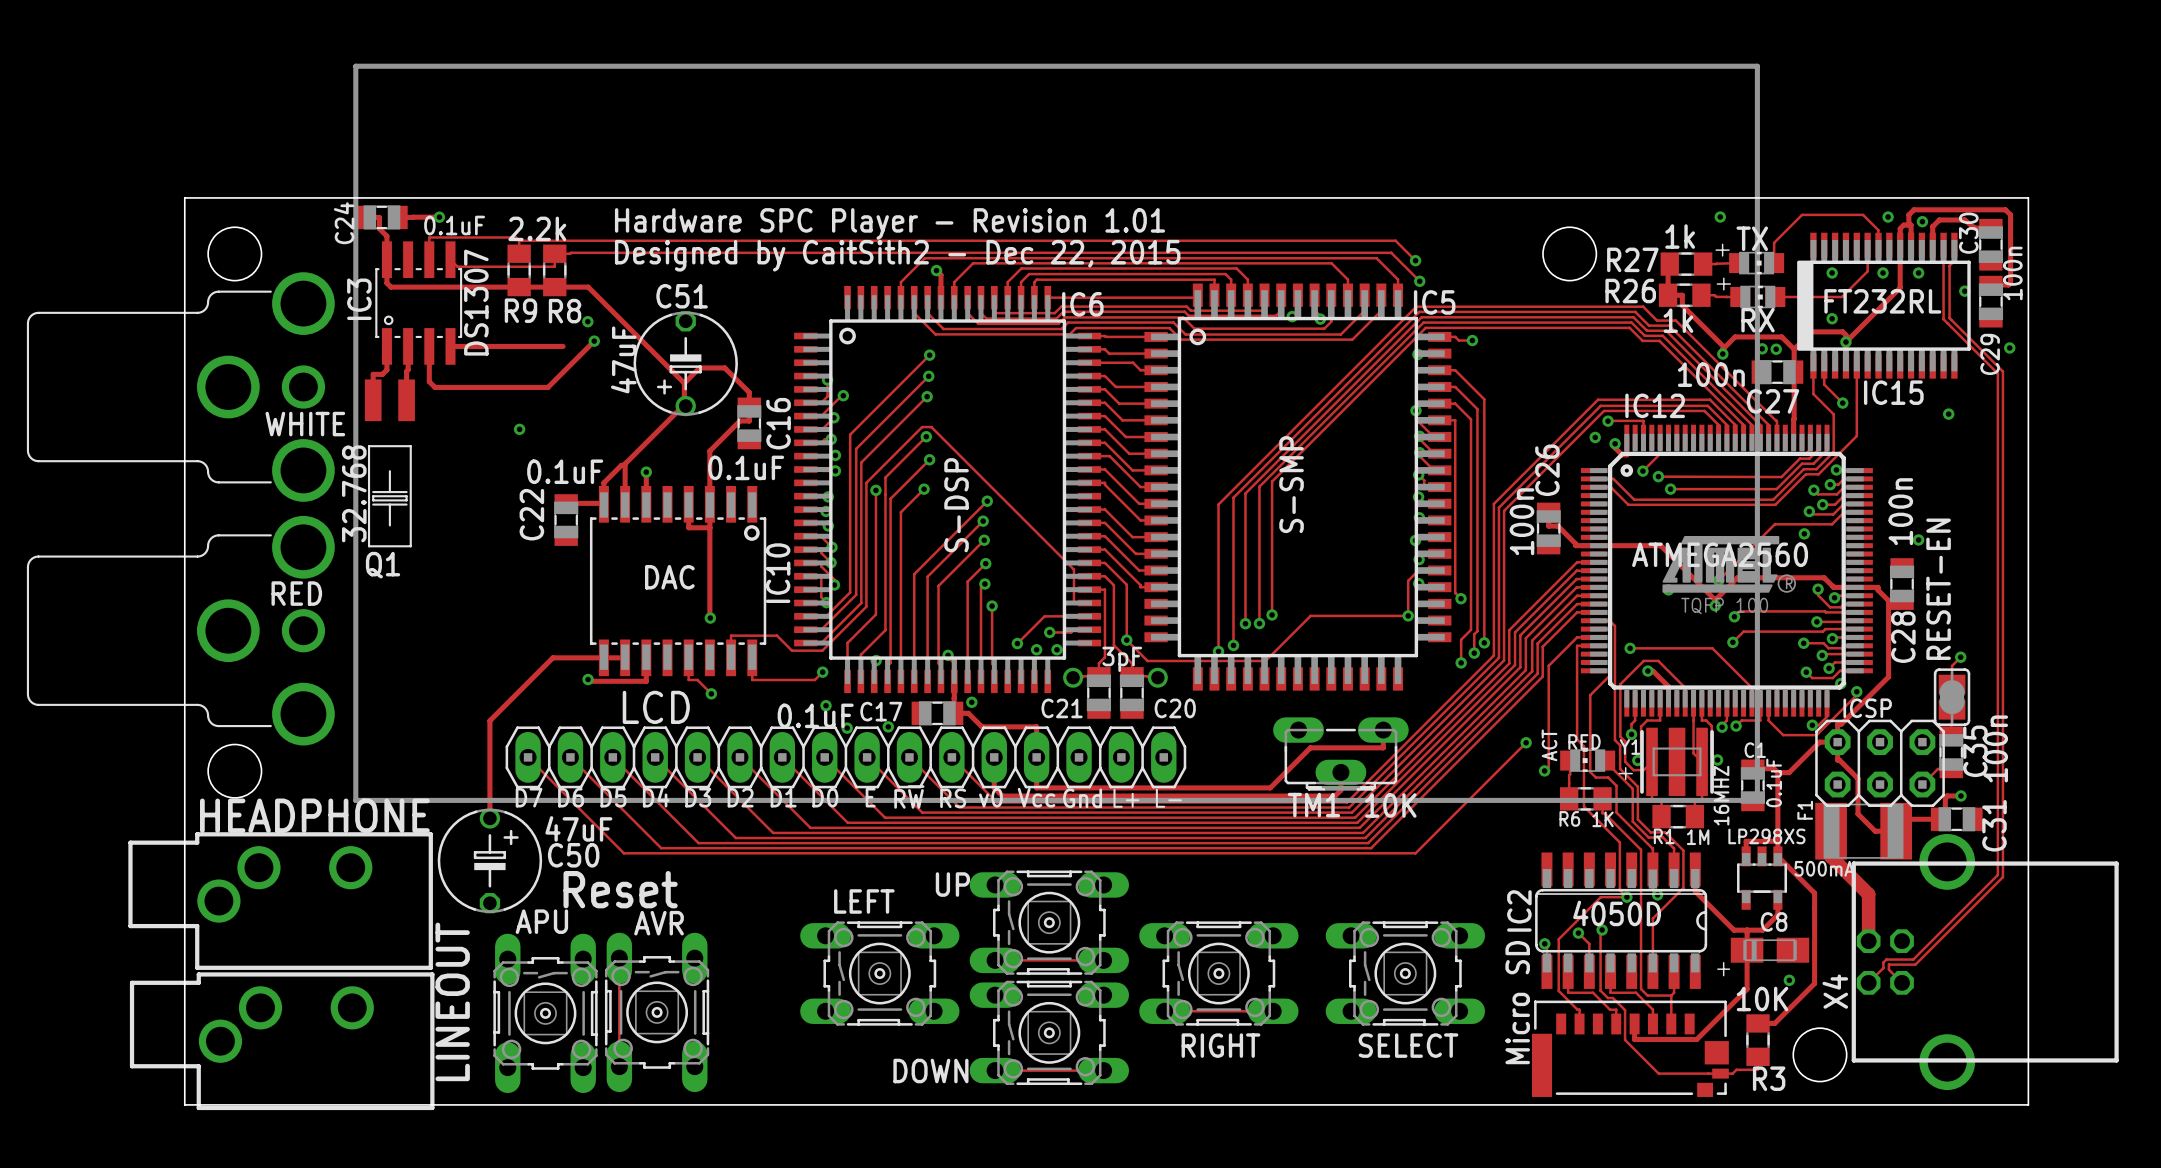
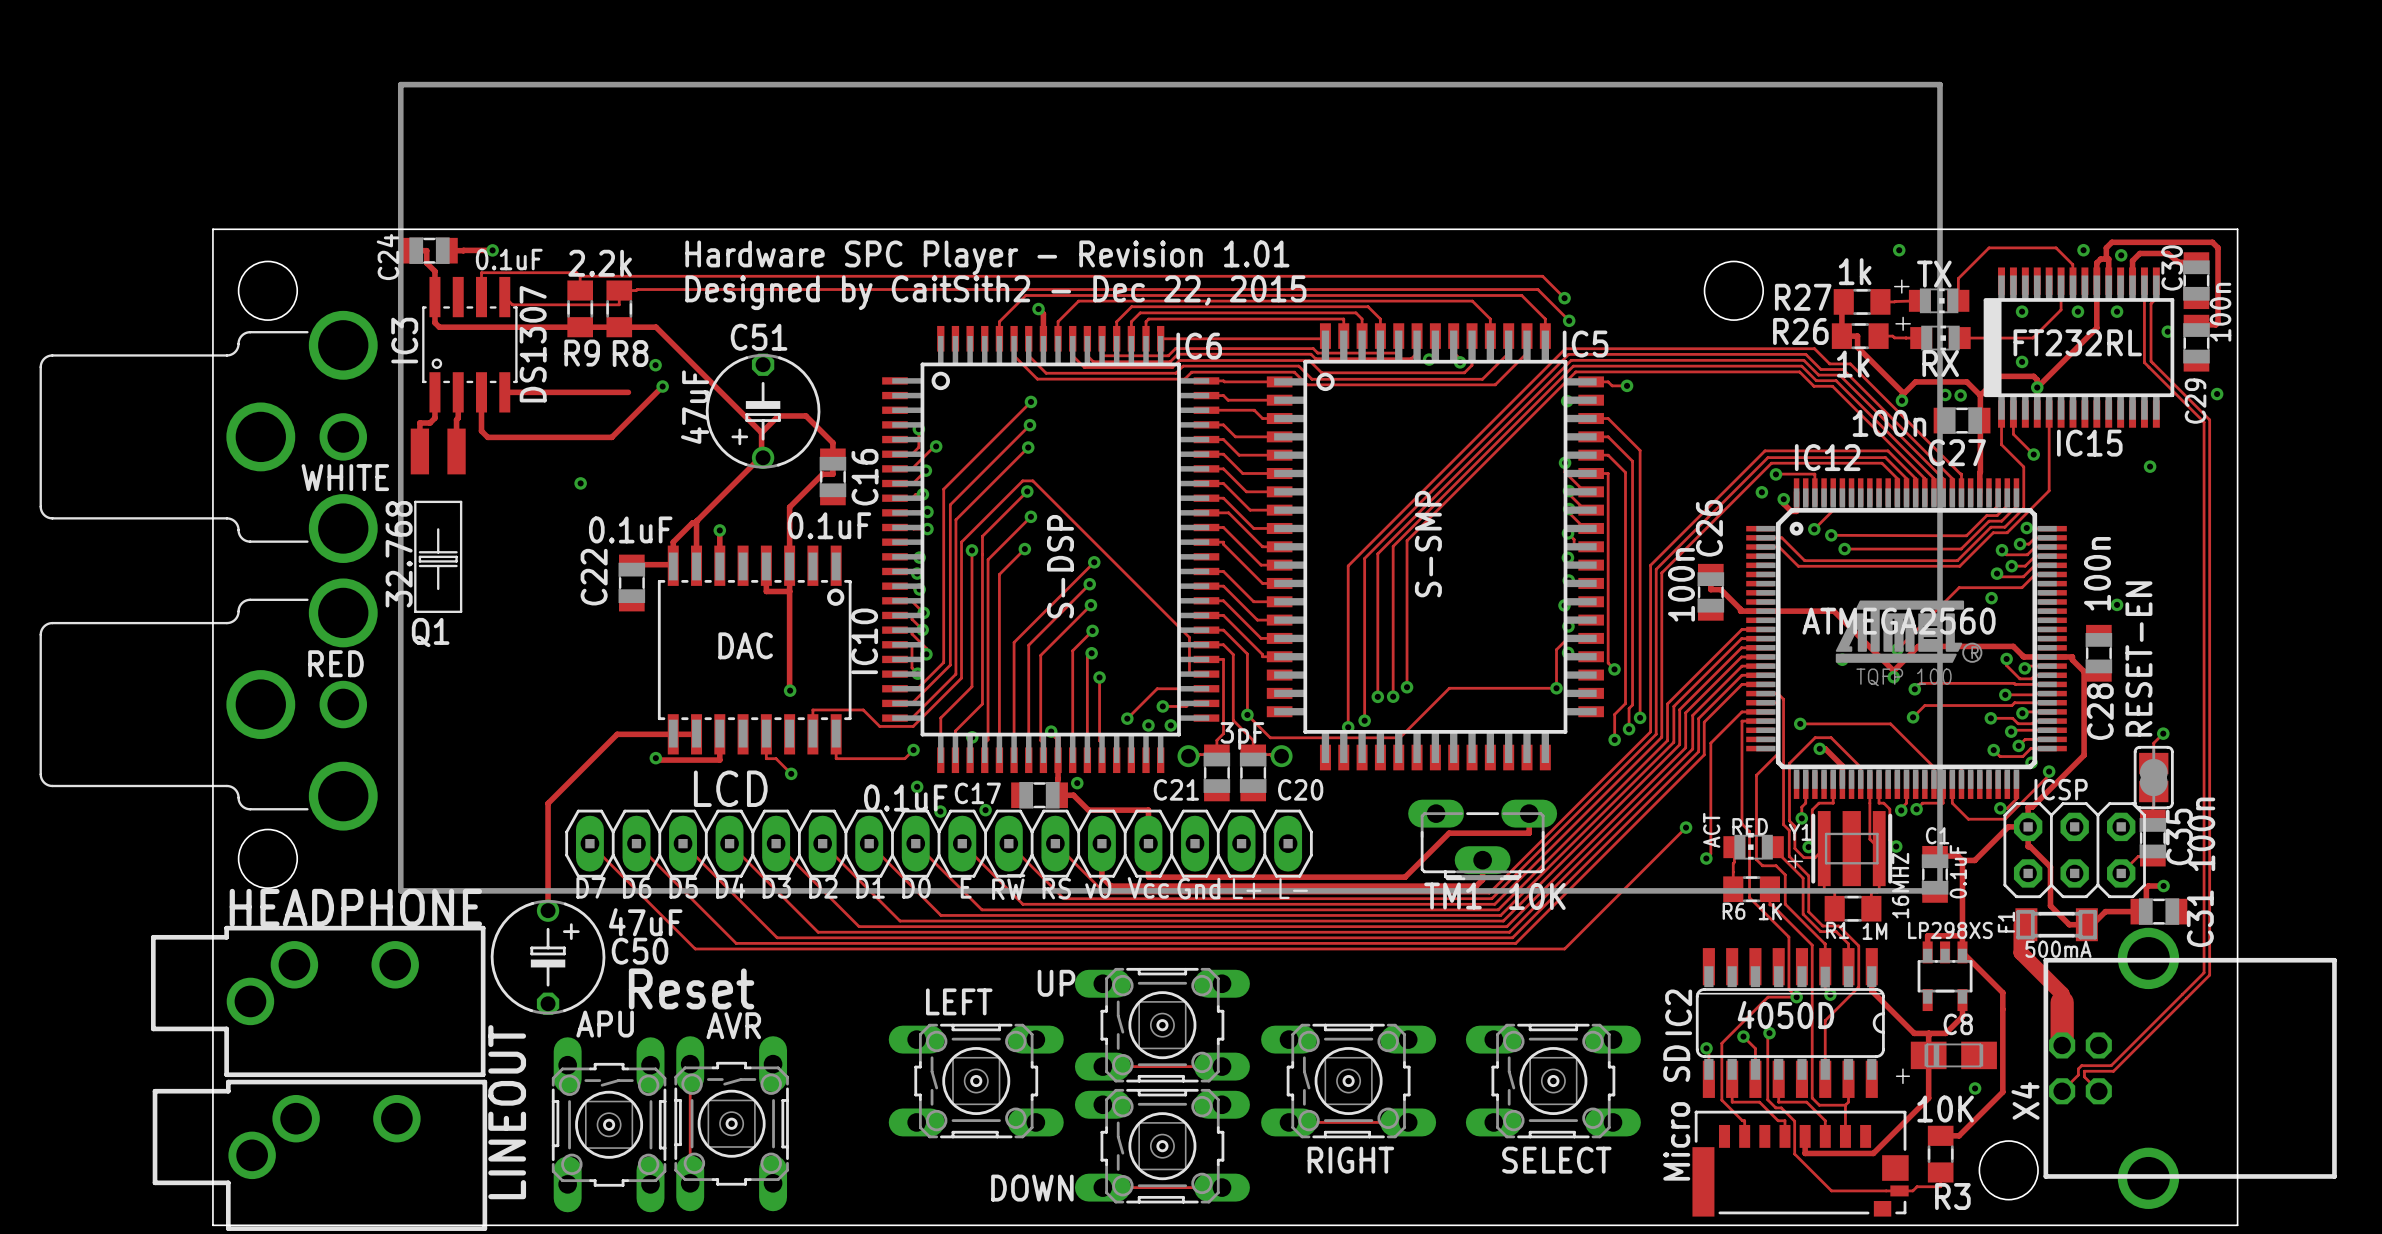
F1 footprint: [1815, 802, 1913, 860] -> [2015, 908, 2098, 942]
F1 value position: 500mA (1824, 868) -> 500mA (2058, 949)
track width: thin (1868, 901) (1868, 941) -> thick (2062, 1002) (2062, 1045)

